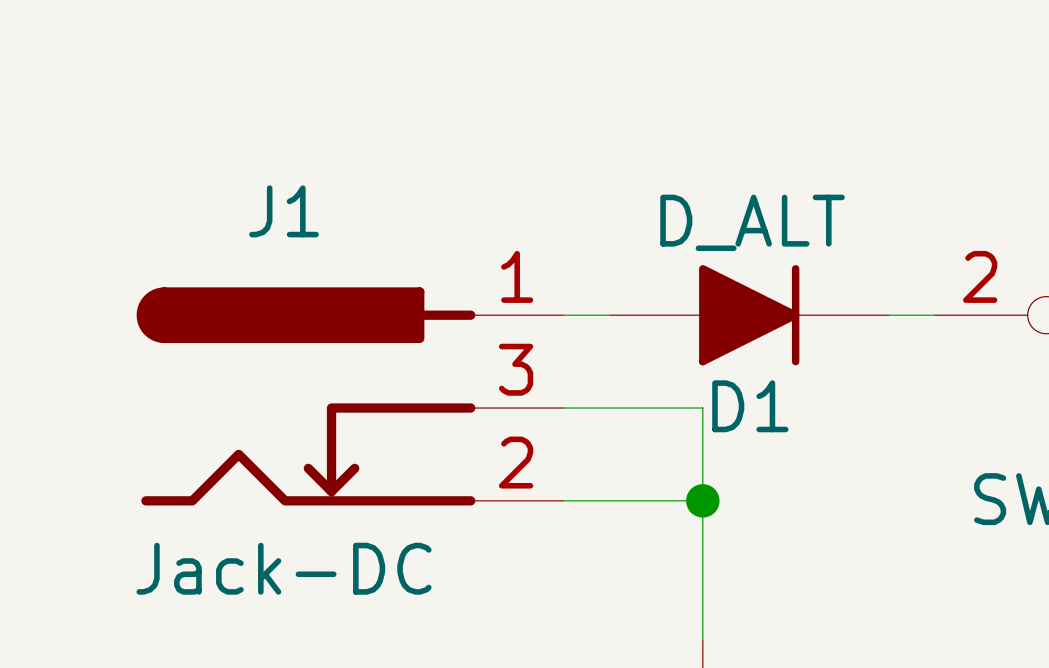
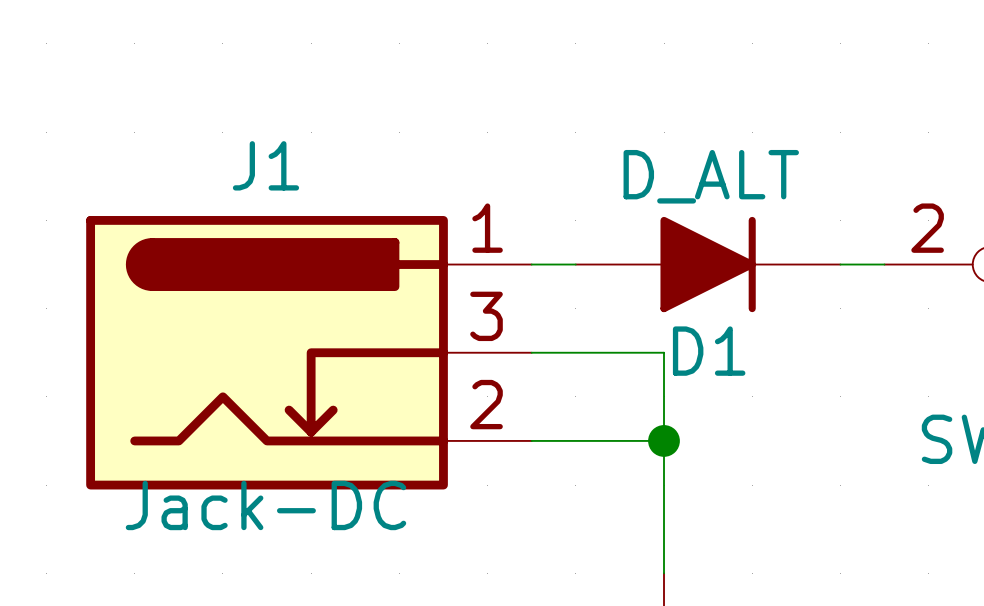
J1 symbol: [136, 287, 564, 506] -> [86, 216, 532, 490]

